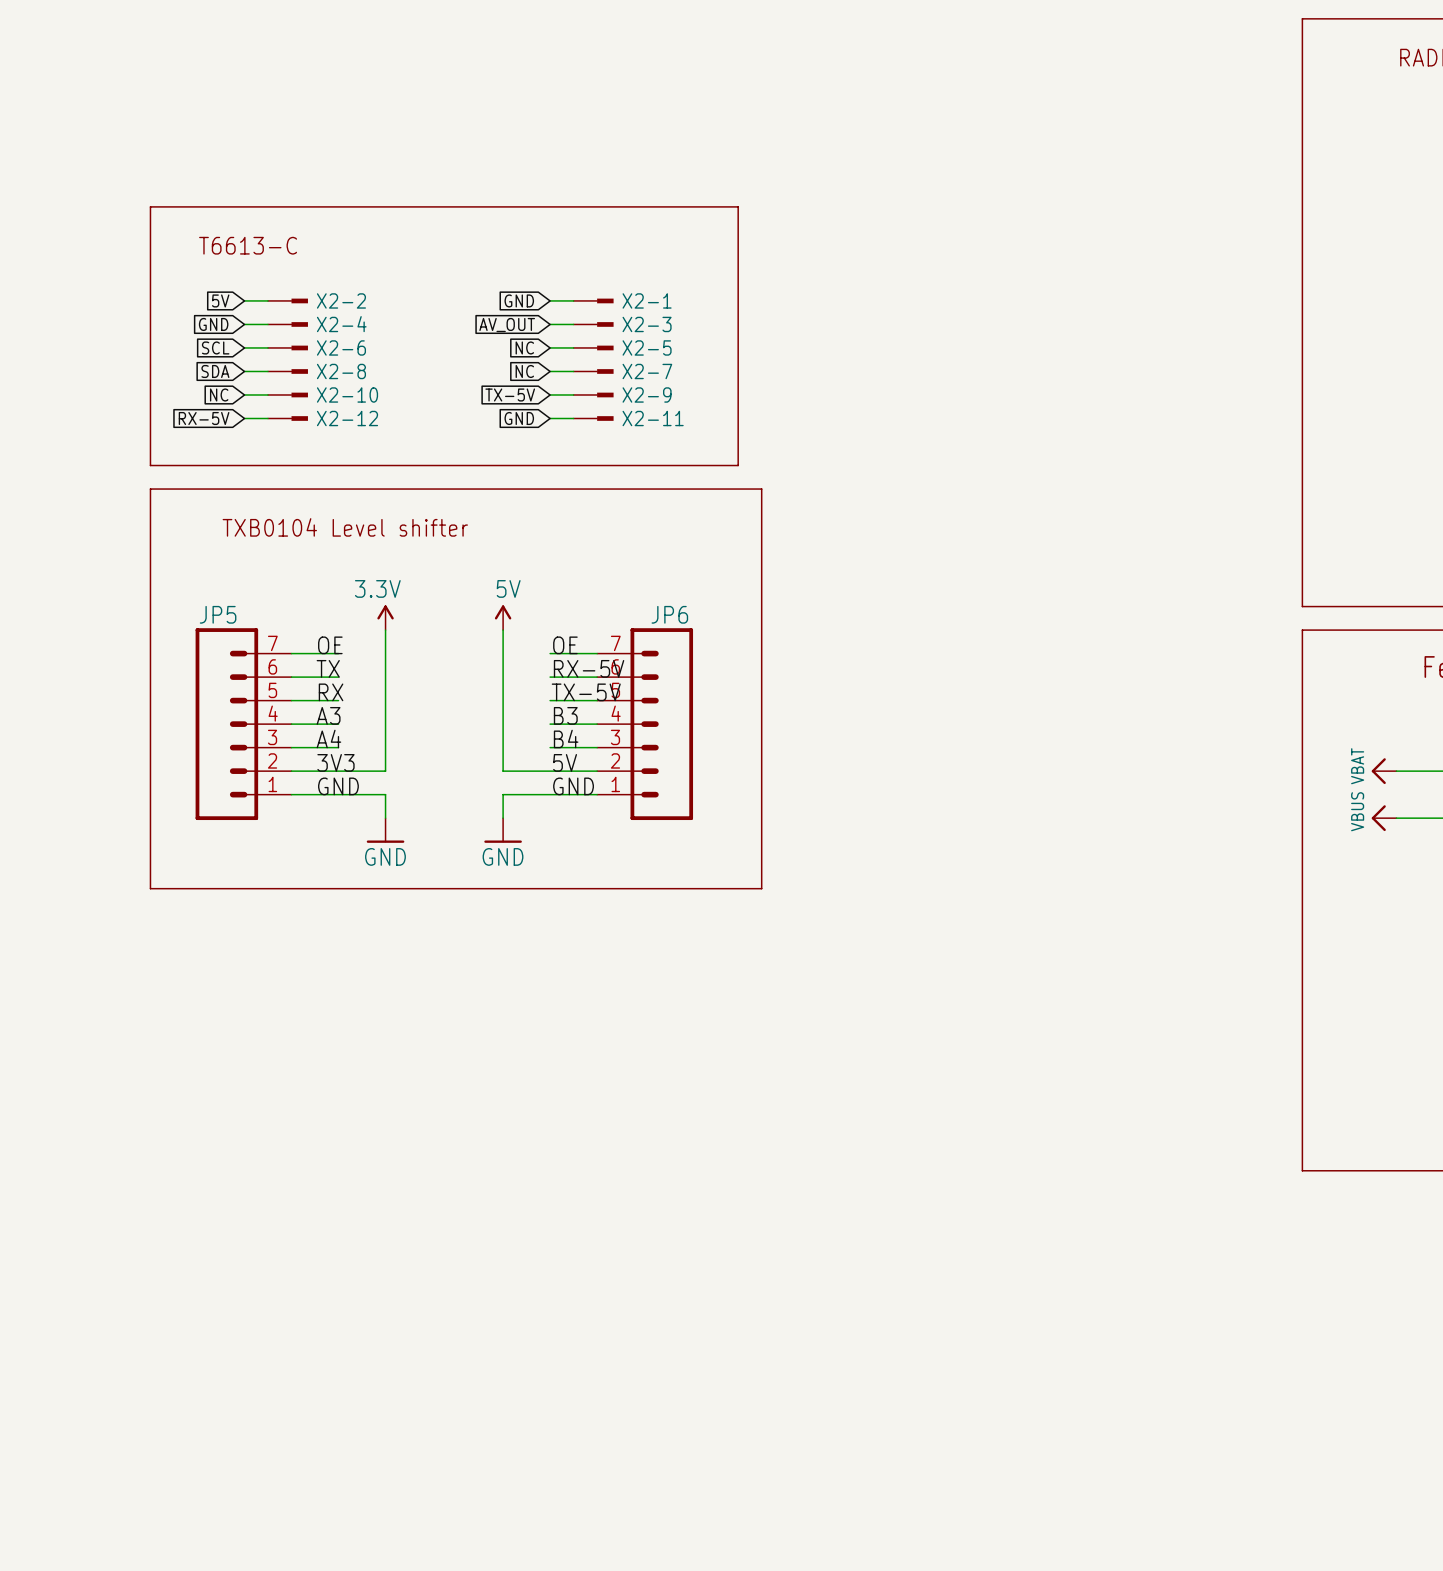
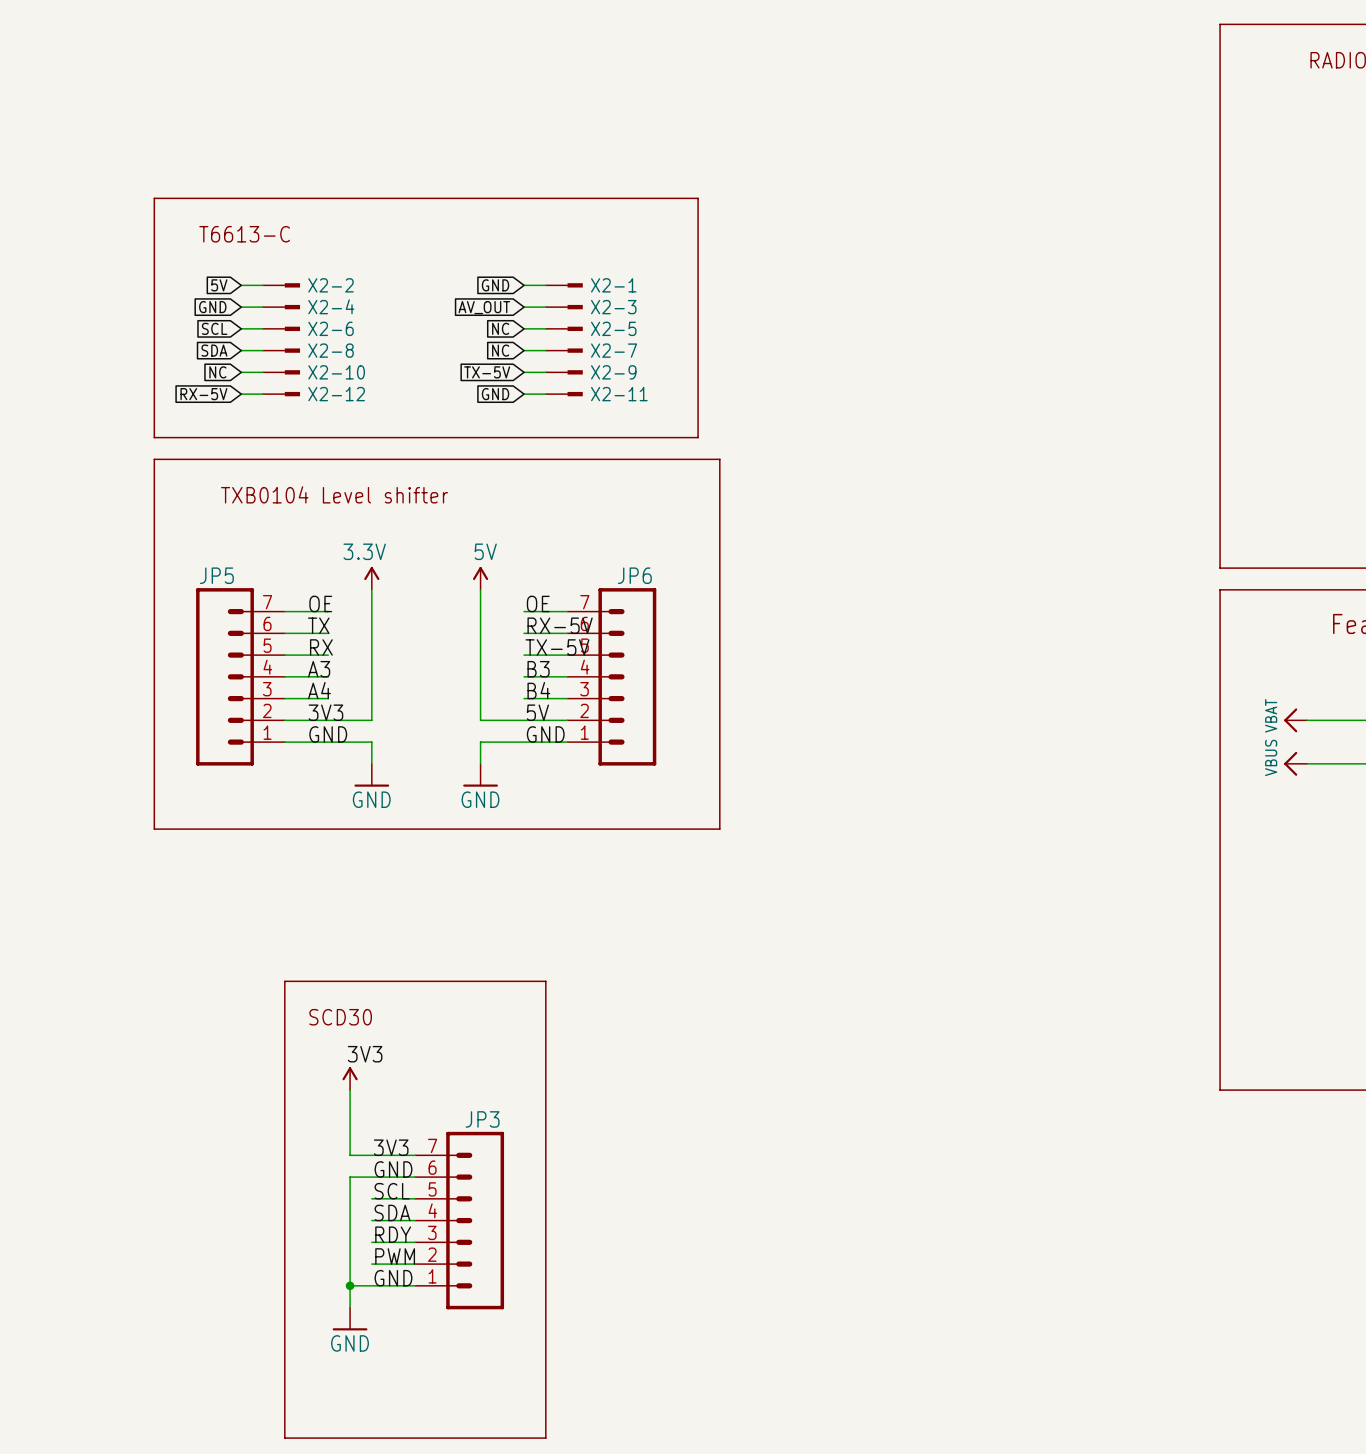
line: none -> (284, 981) (284, 1438) (545, 1438) (545, 981) (284, 981)
text: none -> SCD30 (340, 1017)
label: none -> 3V3 (365, 1054)
power symbol: none -> (350, 1078)
wire: none -> (350, 1090) (350, 1155) (415, 1155)
label: none -> 3V3 (391, 1147)
label: none -> GND (393, 1169)
wire: none -> (415, 1177) (350, 1177) (350, 1307)
label: none -> SCL (392, 1191)
wire: none -> (371, 1198) (415, 1198)
label: none -> SDA (392, 1212)
wire: none -> (371, 1220) (415, 1220)
JP3: none -> (459, 1220)
label: none -> RDY (393, 1234)
wire: none -> (371, 1242) (415, 1242)
label: none -> PWM (395, 1256)
wire: none -> (371, 1264) (415, 1264)
label: none -> GND (393, 1278)
wire: none -> (350, 1285) (415, 1285)
junction: none -> (350, 1285)
power symbol: none -> GND (350, 1319)

